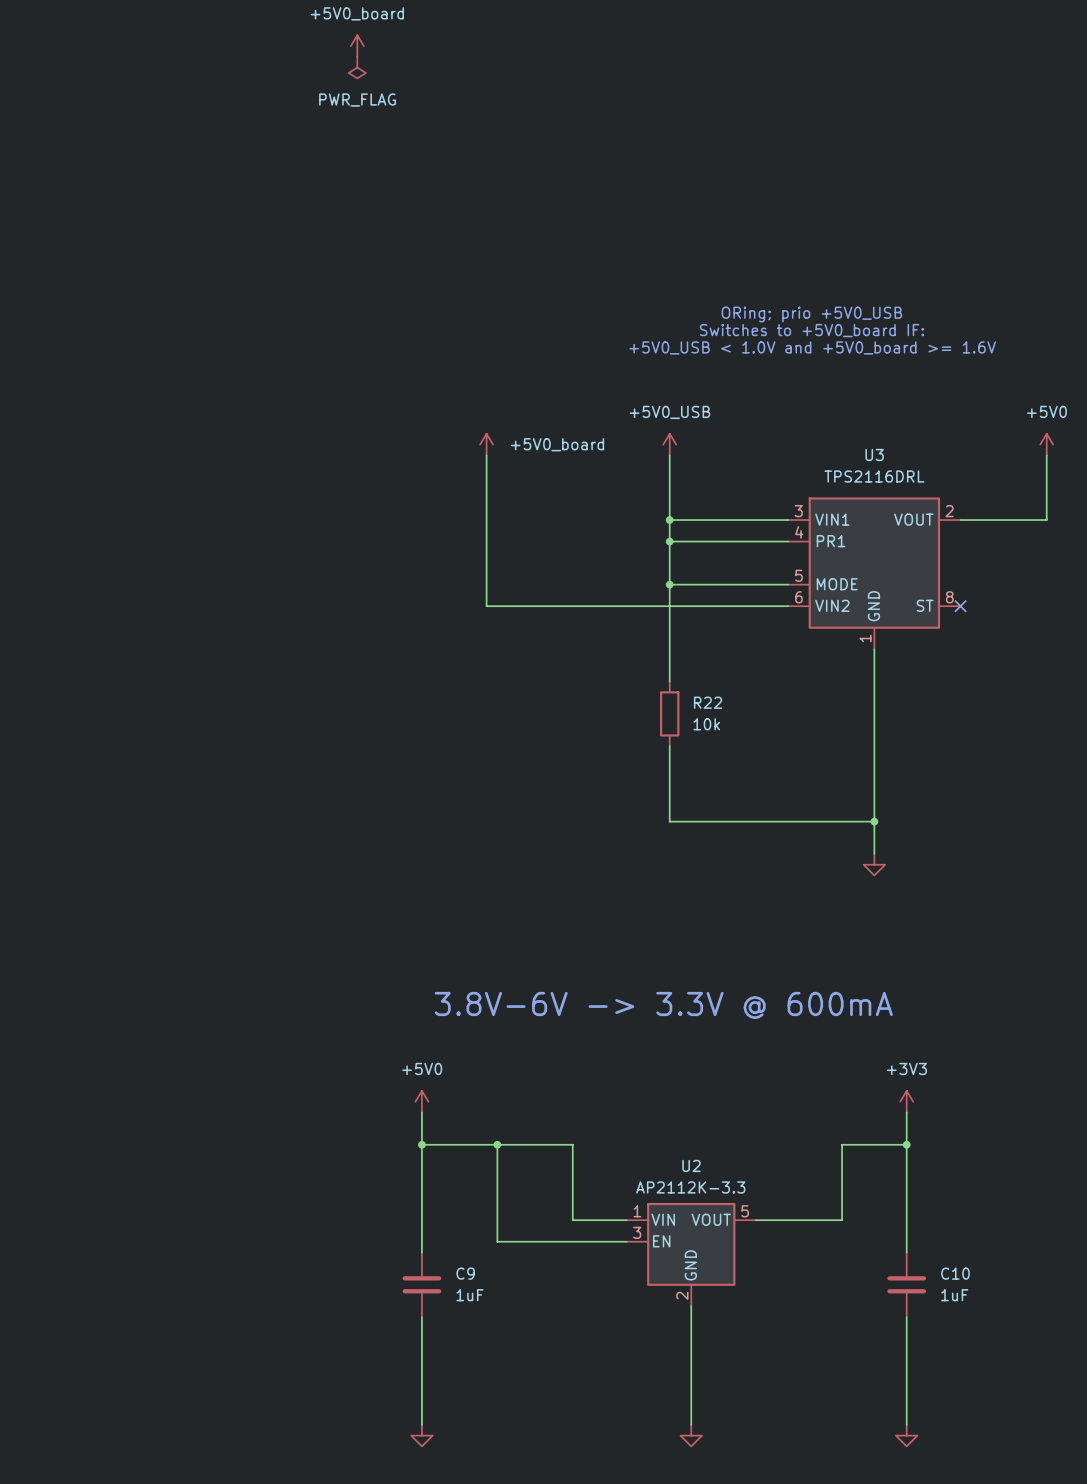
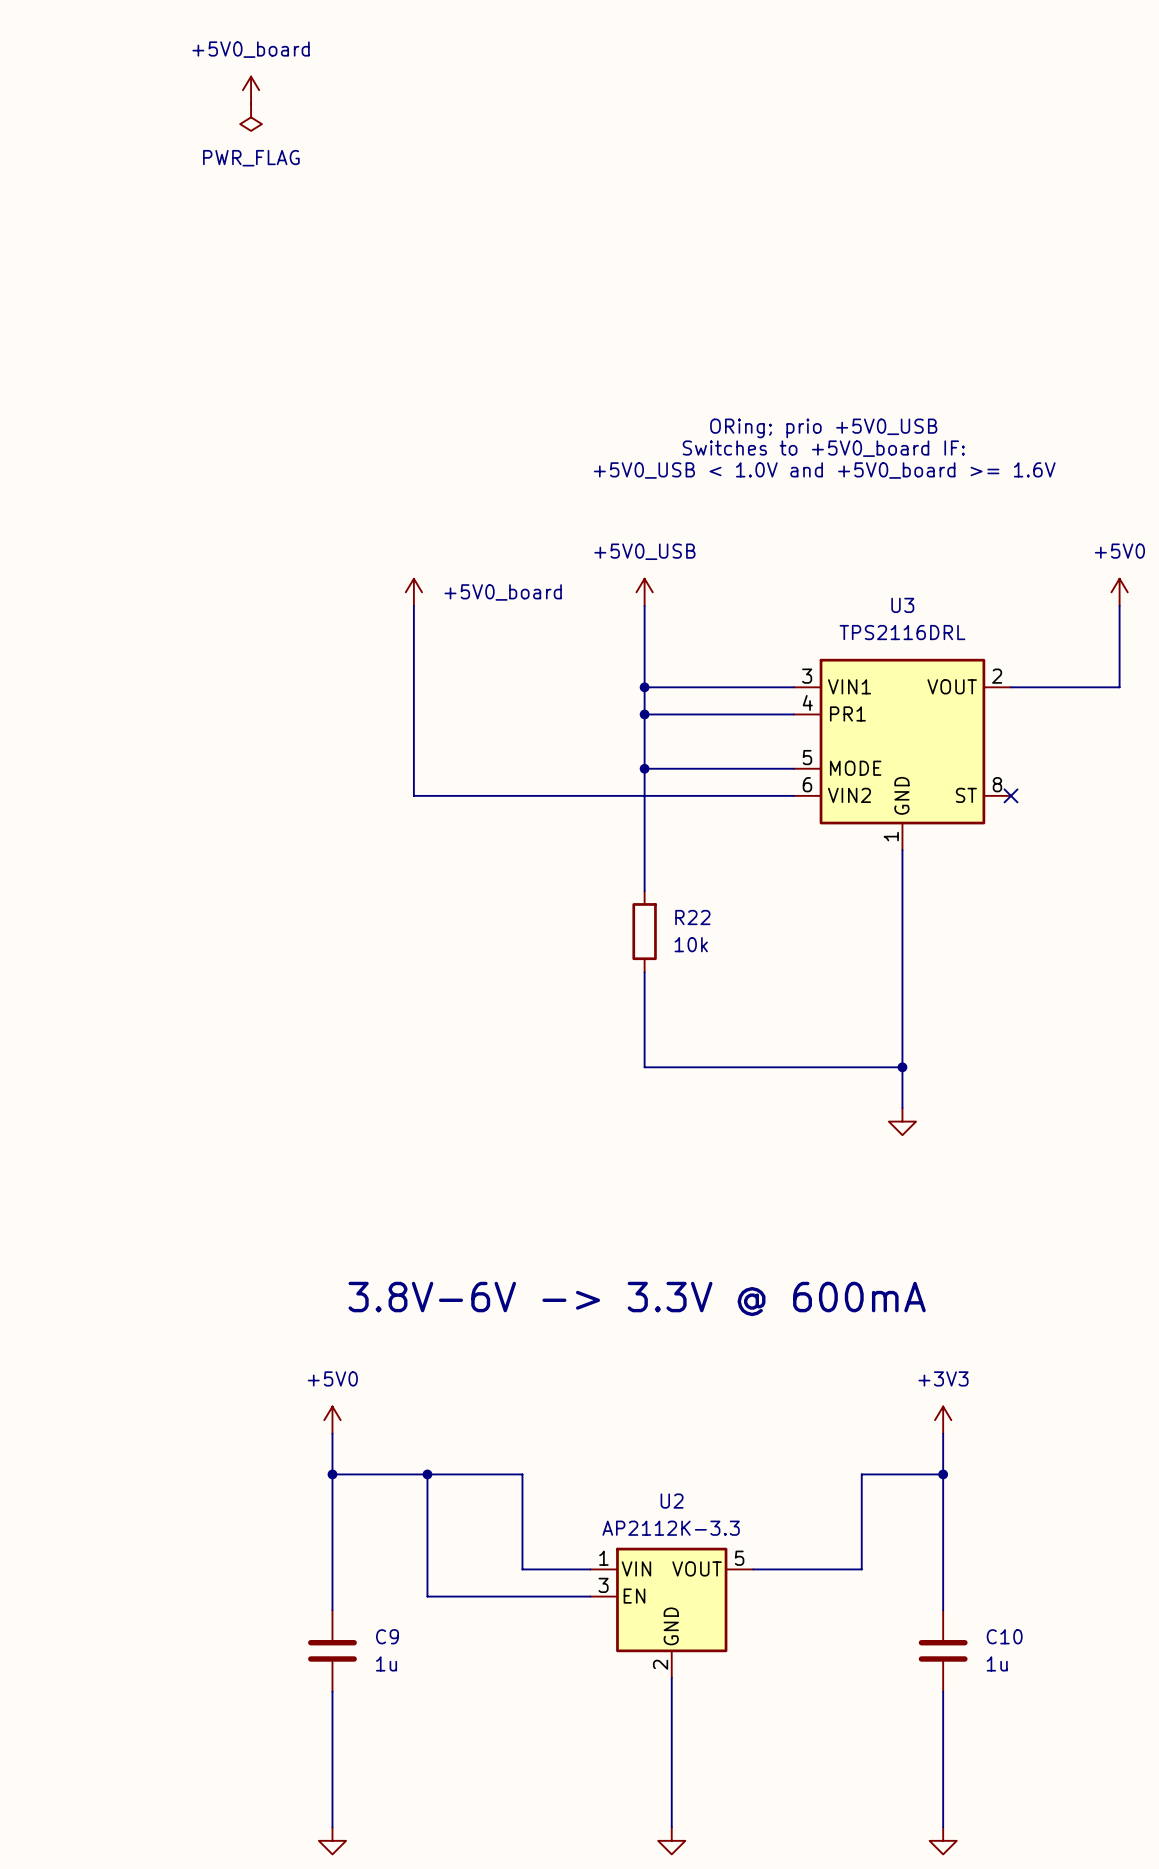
C9 value: 1uF (470, 1295) -> 1u (386, 1663)
C10 value: 1uF (954, 1295) -> 1u (997, 1663)

